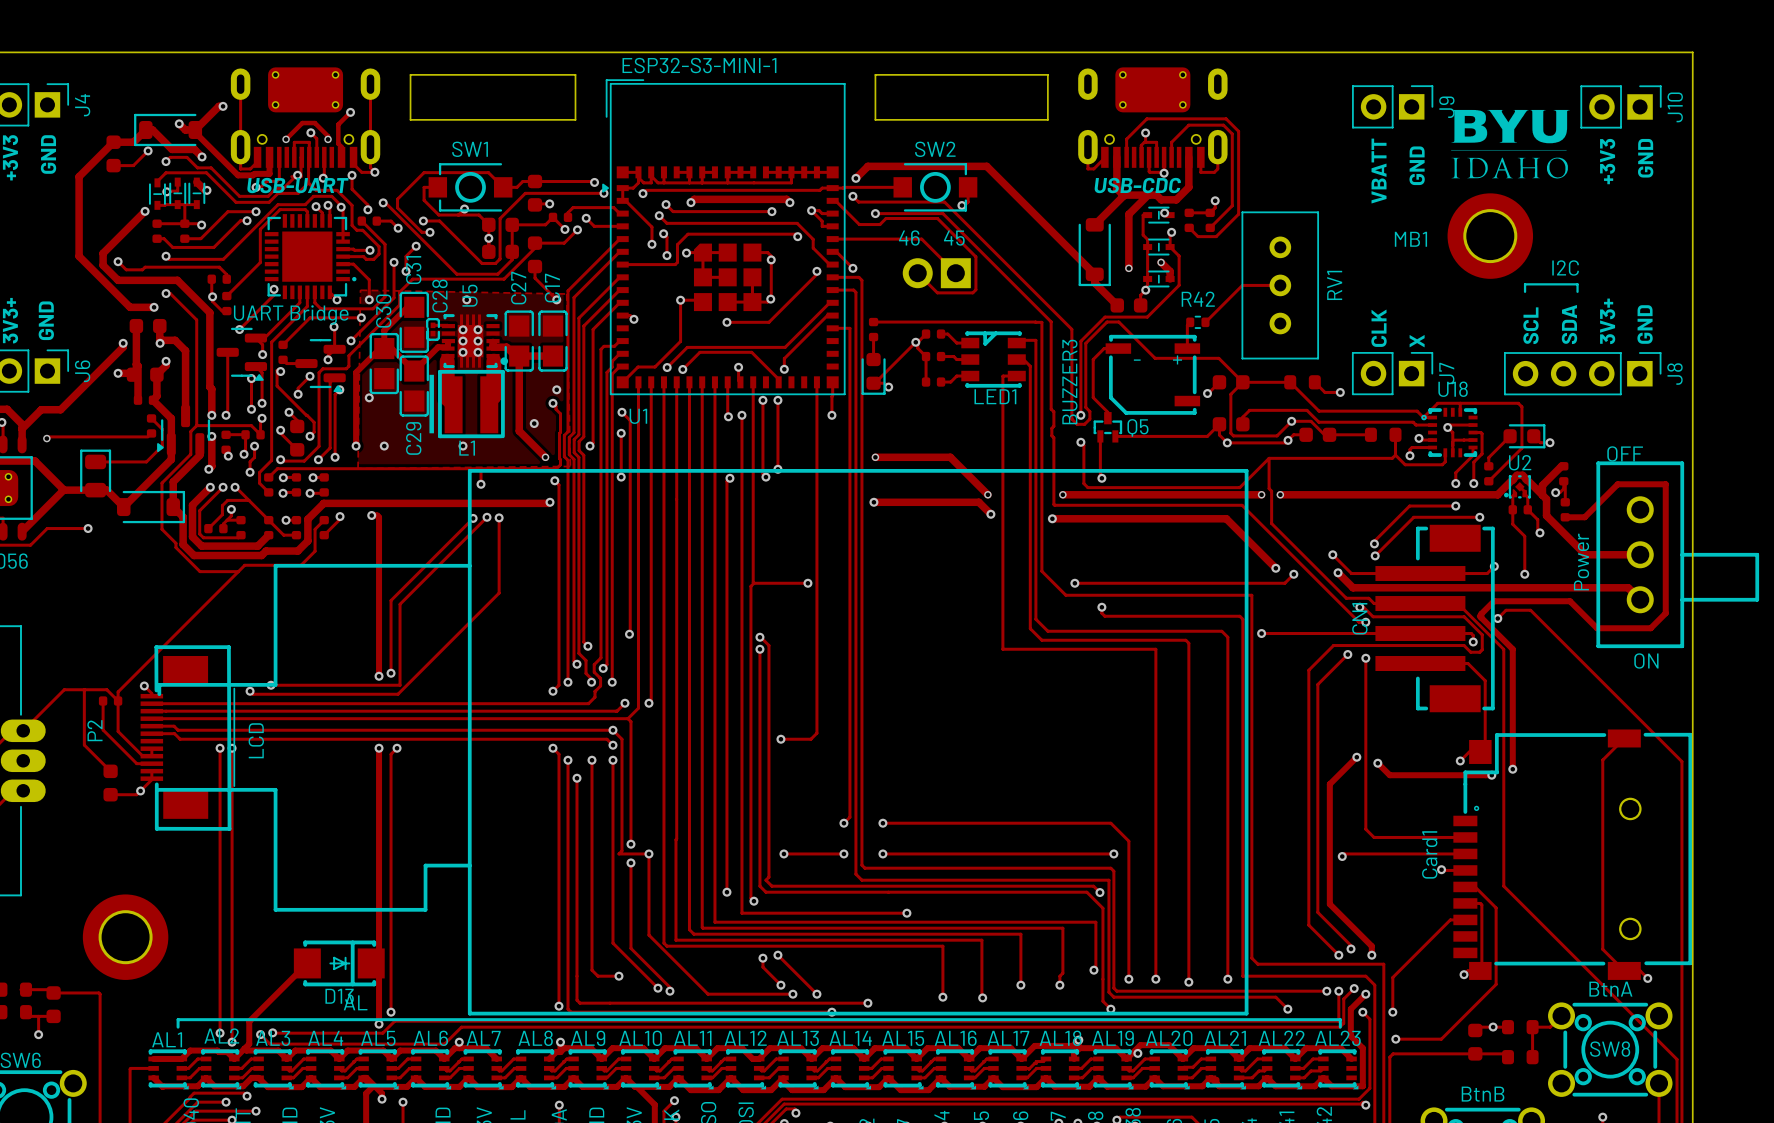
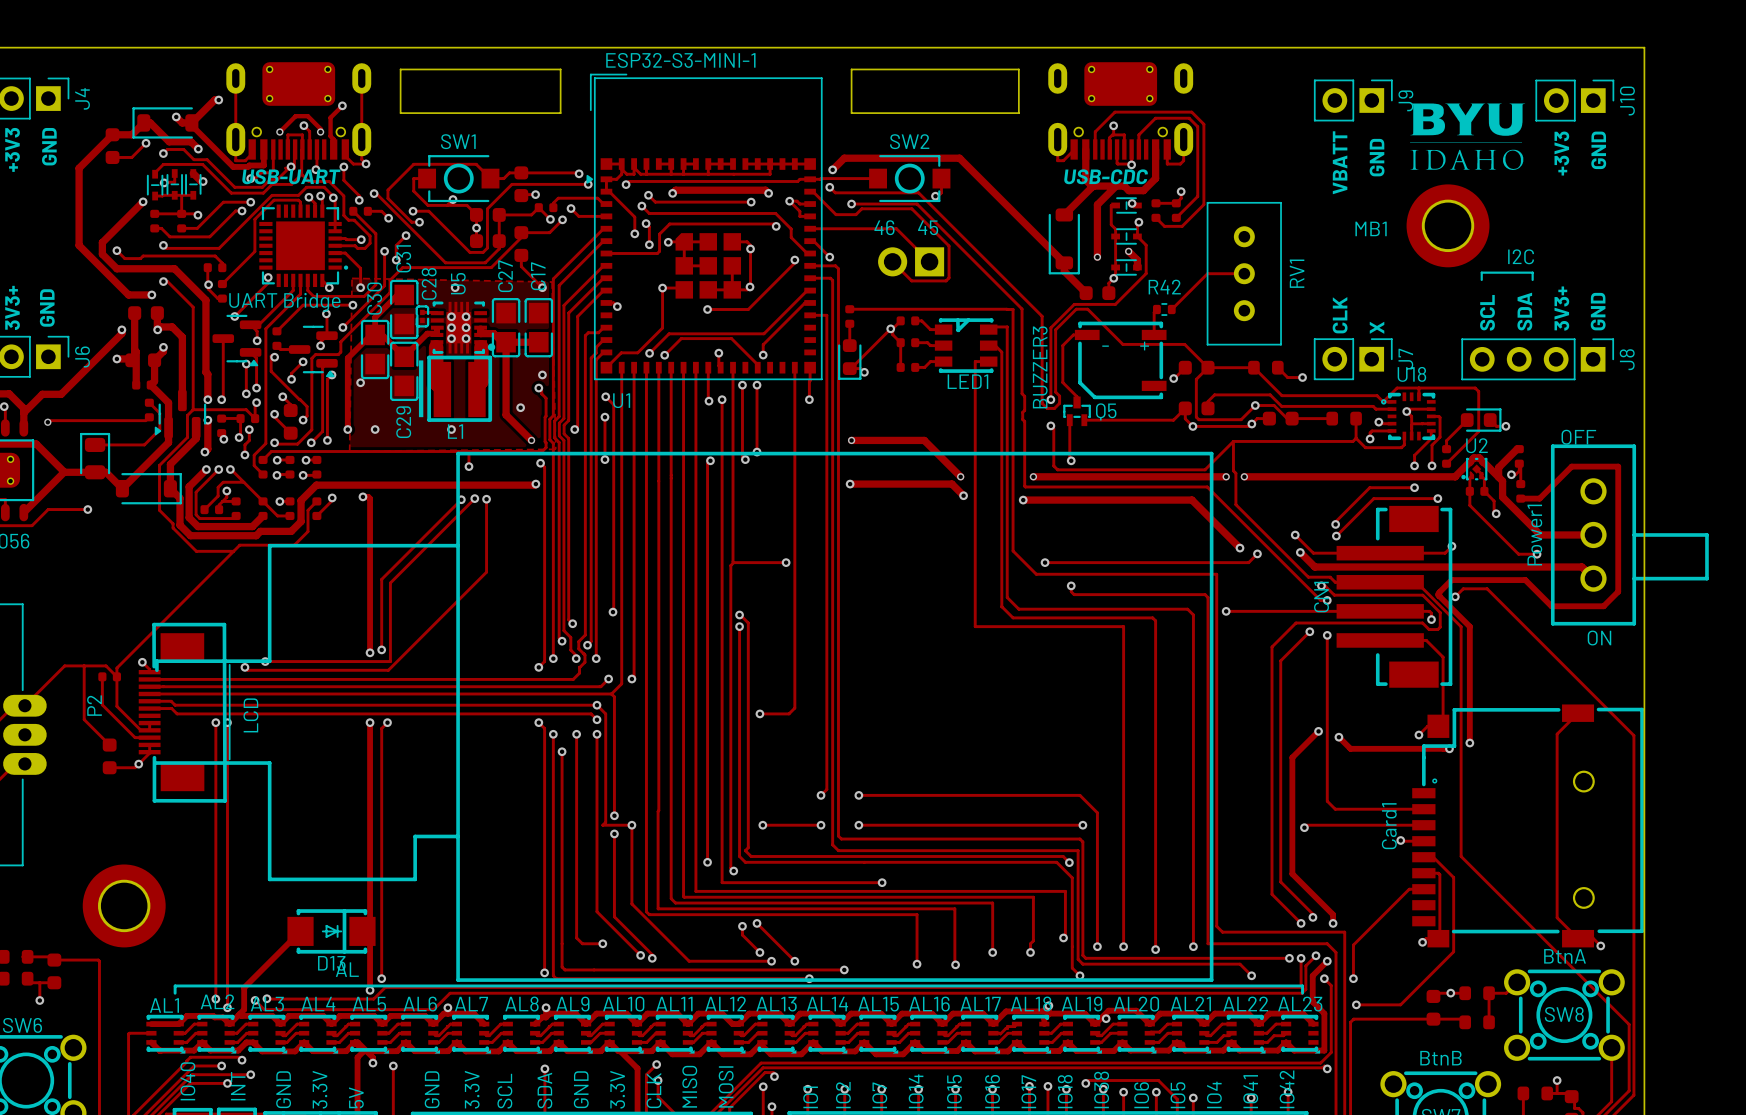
track: (1524, 536) (1524, 574) -> (1481, 517) (1518, 554) (1537, 554)
Power1 name: none -> Power1 (1534, 535)
text: Power (1581, 561) -> none
via position: (1524, 574) -> (1537, 554)

